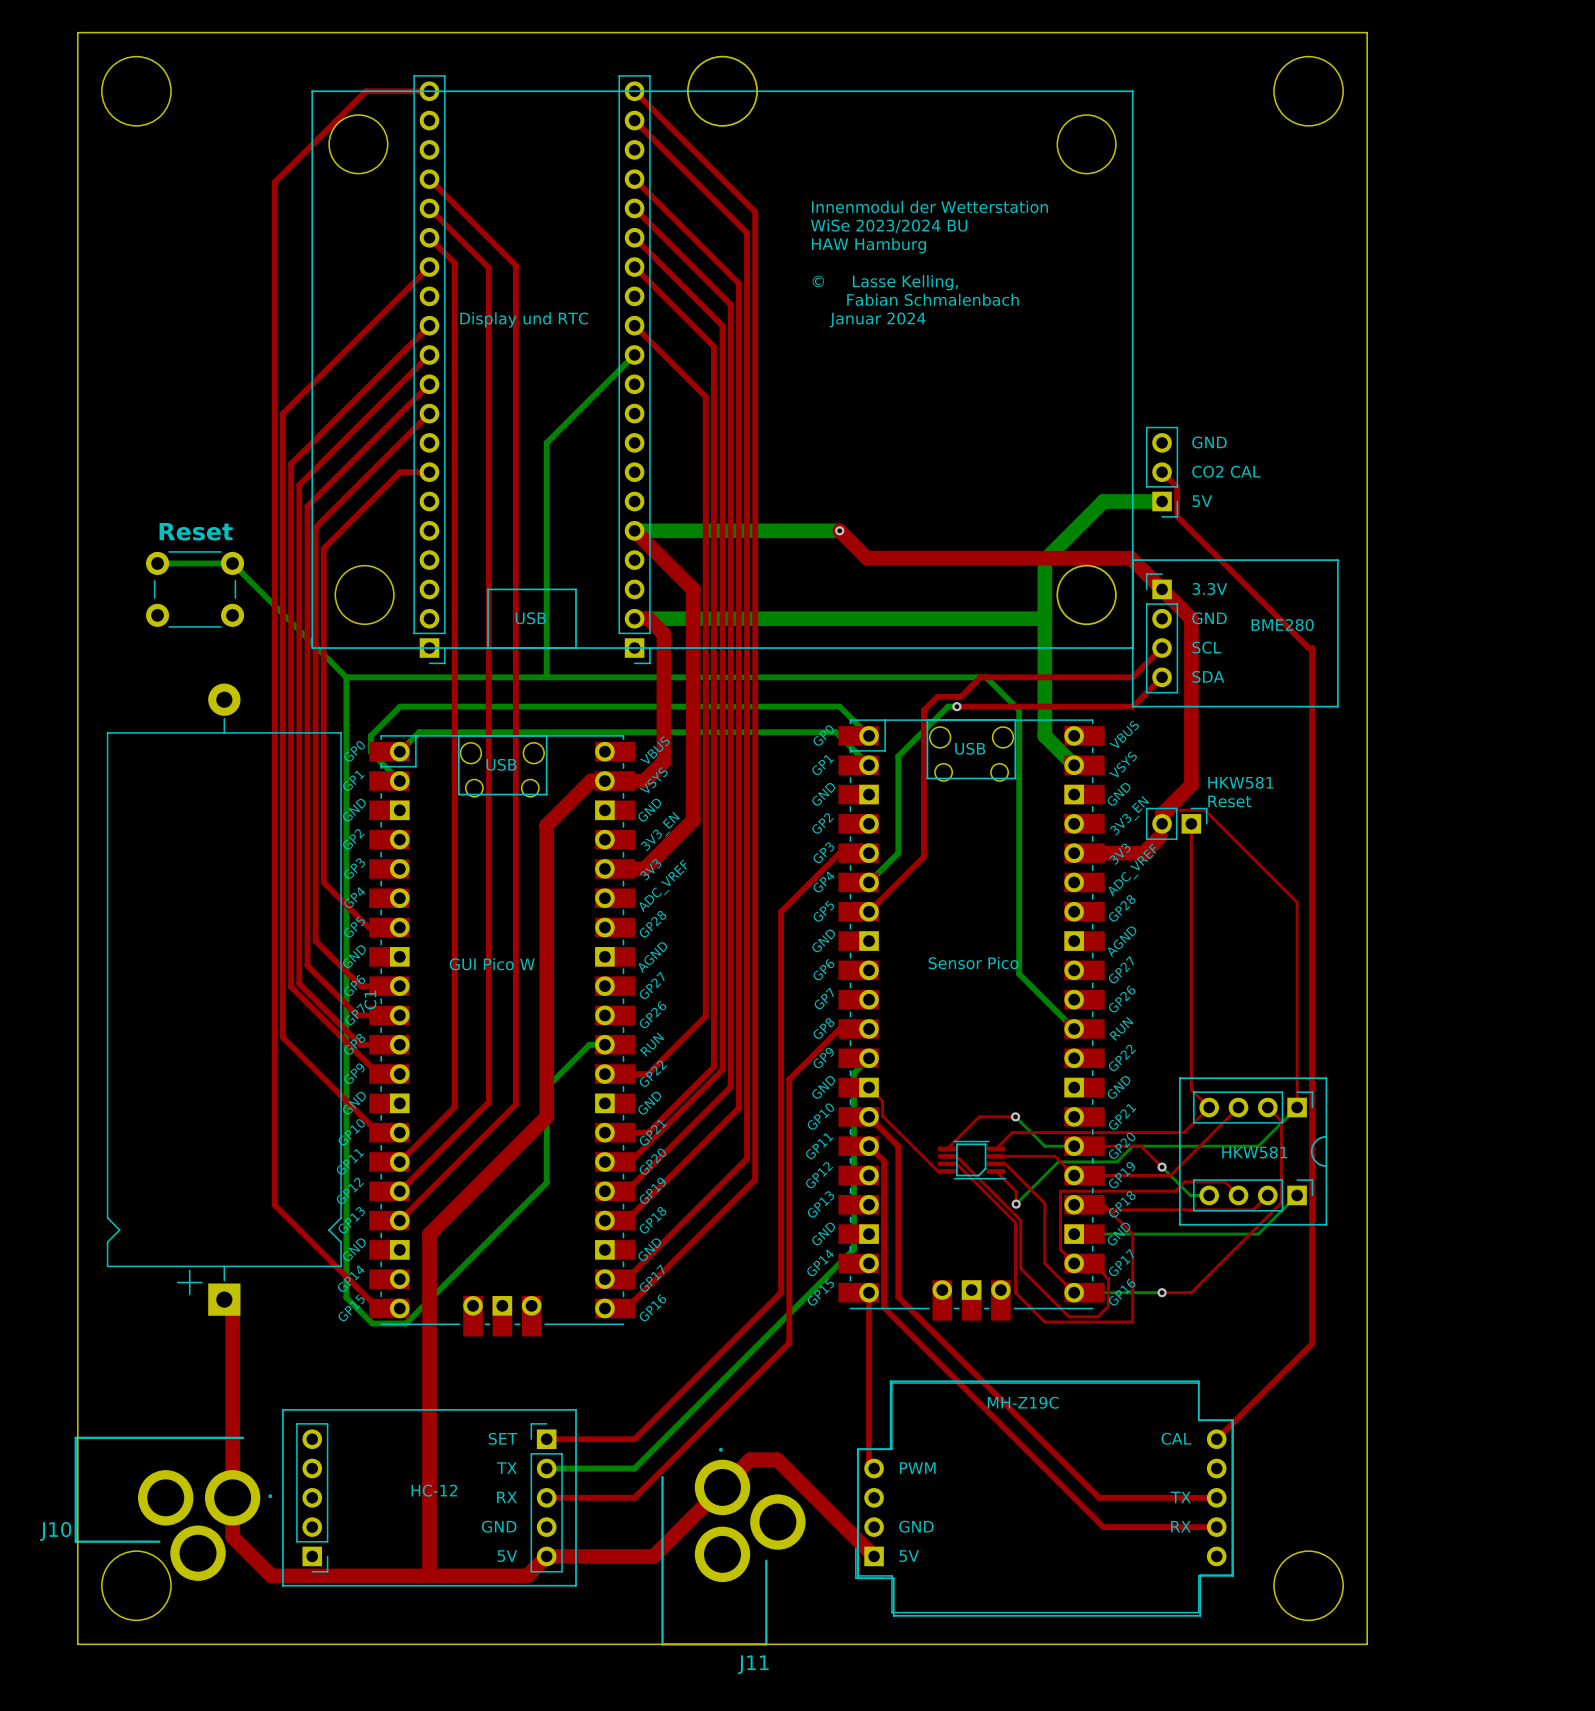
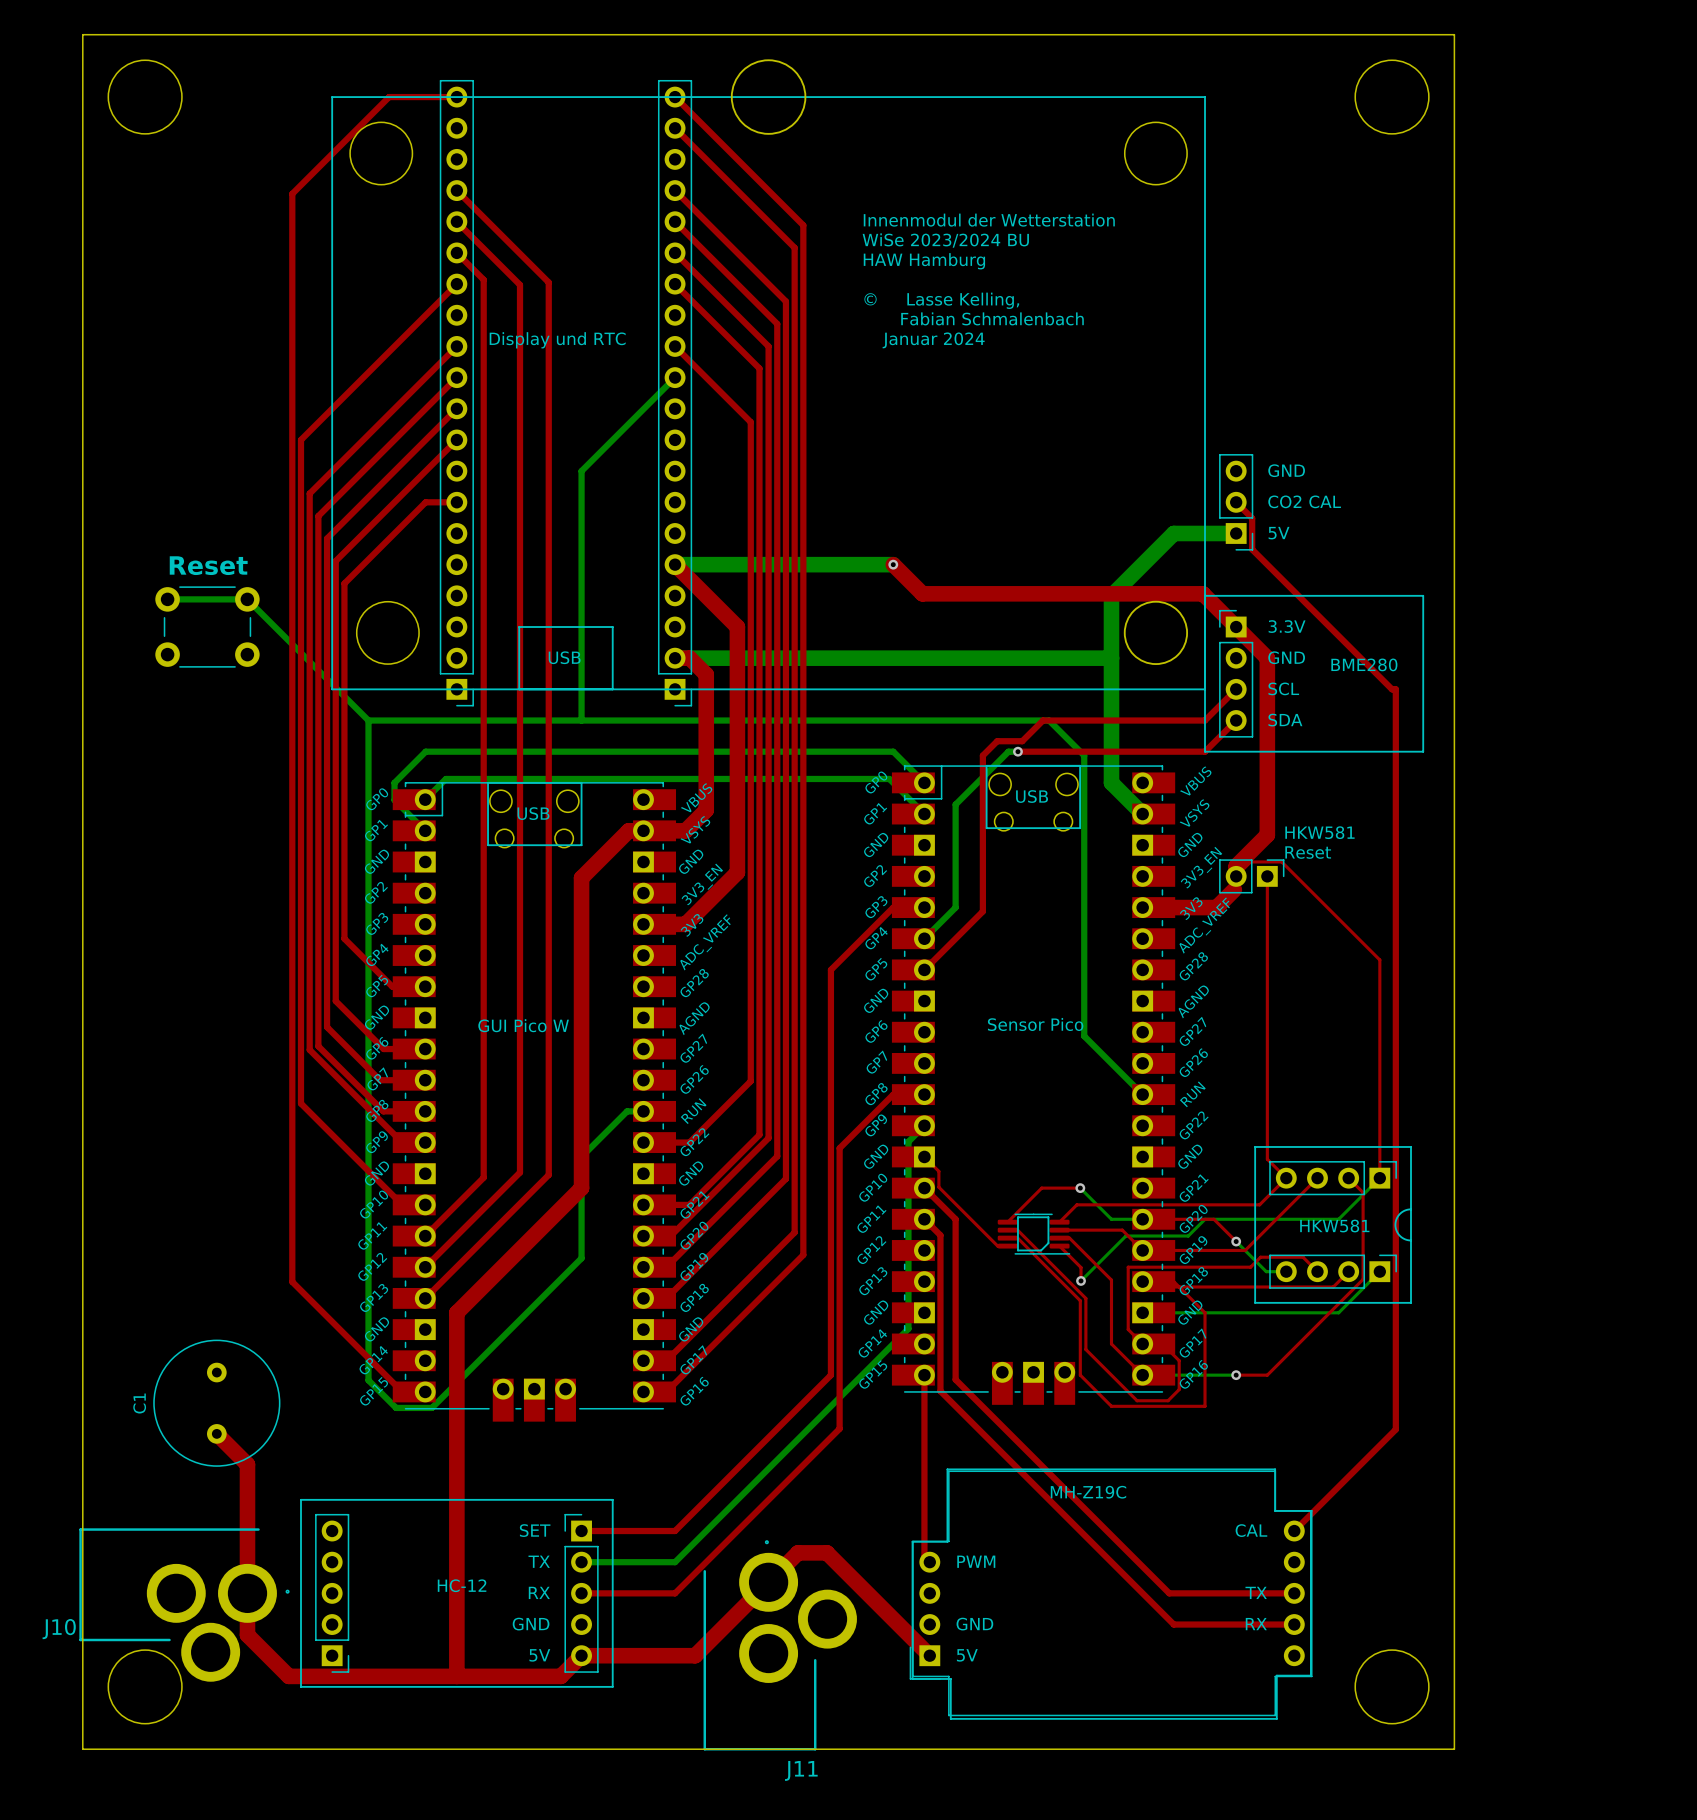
C1 footprint: [106, 683, 342, 1316] -> [153, 1339, 281, 1467]
C1 name position: C1 (370, 999) -> C1 (139, 1403)
top track: (224, 1299) (232, 1307) (232, 1376) -> (216, 1433) (247, 1464)

